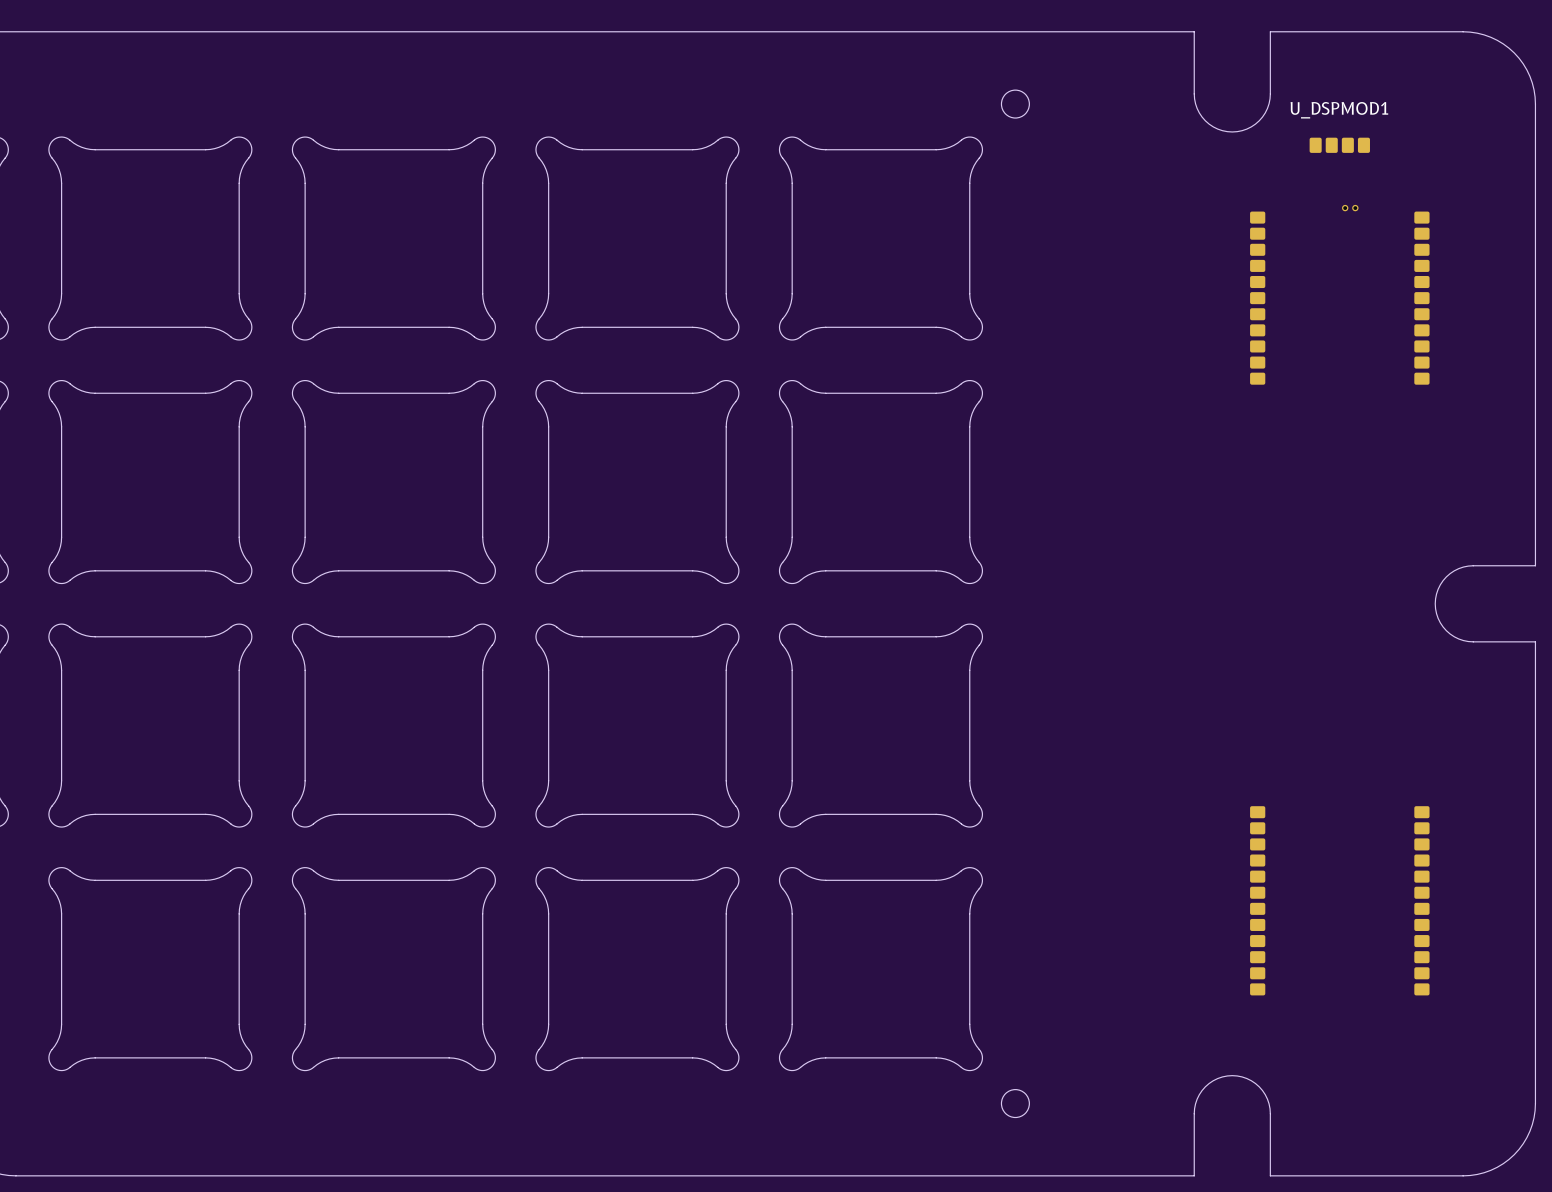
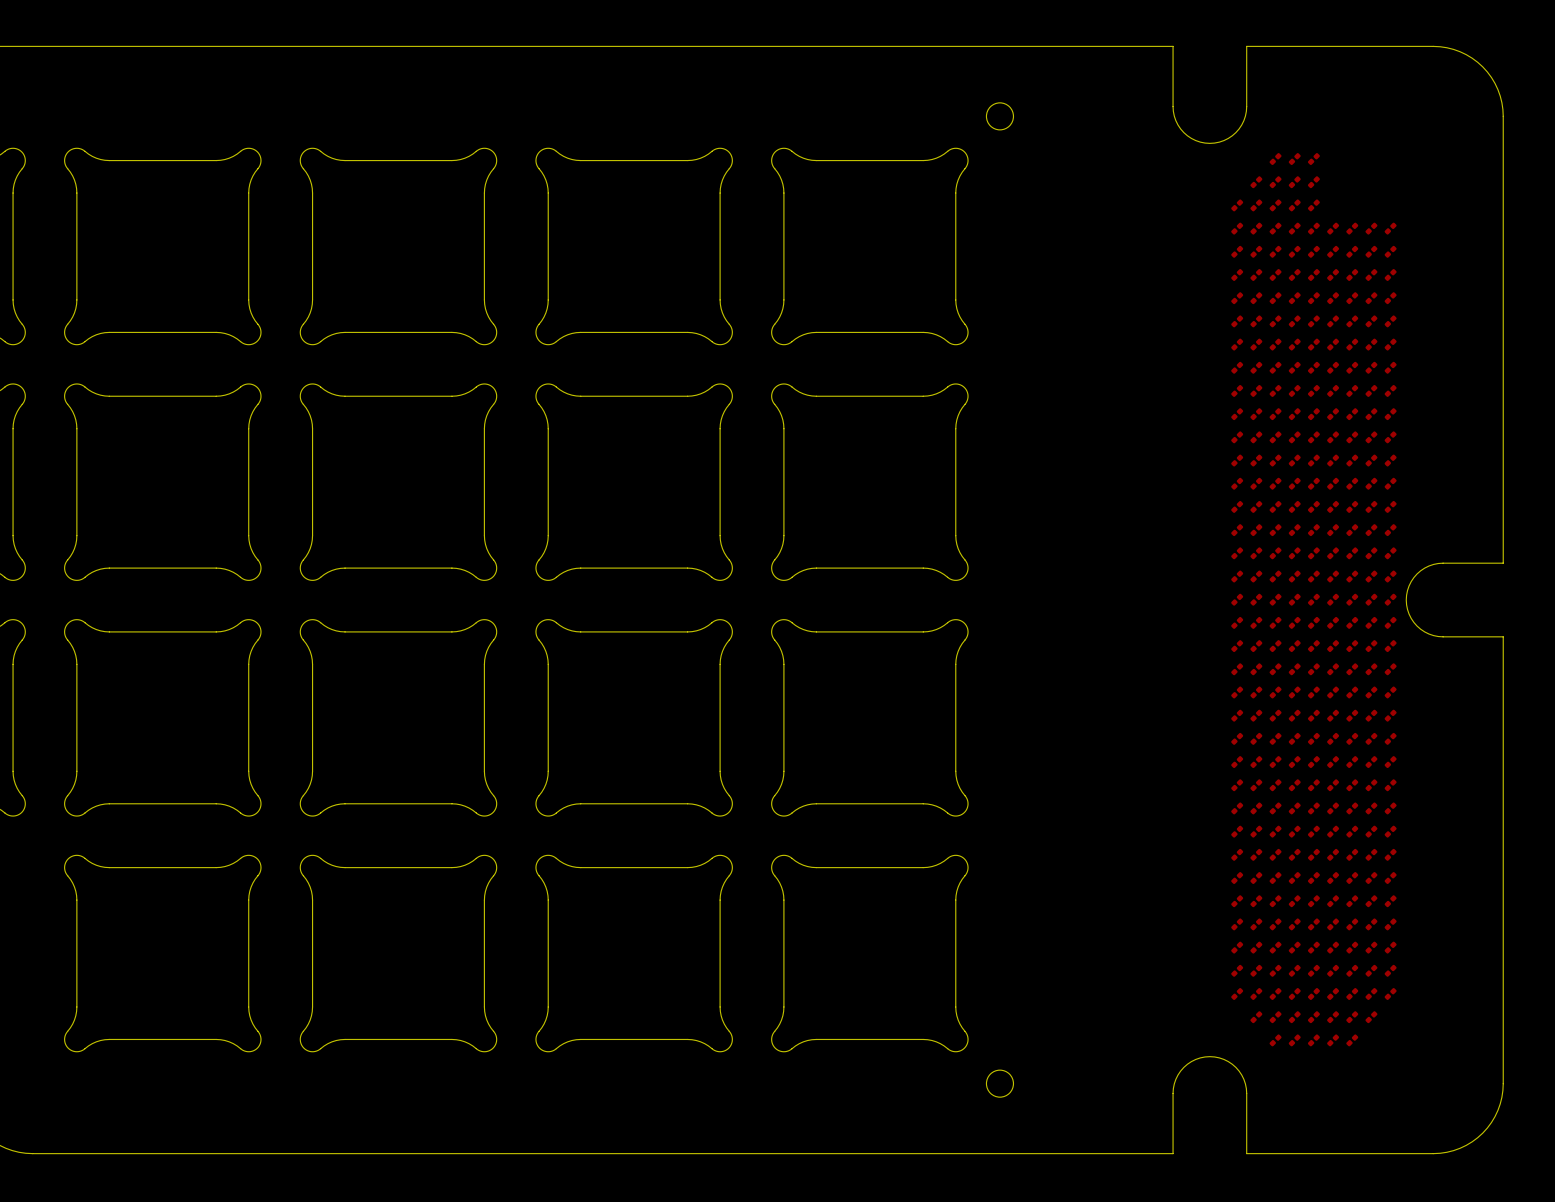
part: none -> (1275, 159)
part: none -> (1294, 159)
part: none -> (1313, 159)
part: none -> (1256, 182)
part: none -> (1275, 182)
part: none -> (1294, 182)
part: none -> (1313, 182)
part: none -> (1237, 205)
part: none -> (1256, 205)
part: none -> (1275, 205)
part: none -> (1294, 205)
part: none -> (1313, 205)
part: (1350, 208) -> none
part: none -> (1237, 228)
part: none -> (1256, 228)
part: none -> (1275, 228)
part: none -> (1294, 228)
part: none -> (1313, 228)
part: none -> (1333, 228)
part: none -> (1352, 228)
part: none -> (1371, 228)
part: none -> (1390, 228)
part: none -> (1237, 251)
part: none -> (1256, 251)
part: none -> (1275, 251)
part: none -> (1294, 251)
part: none -> (1313, 251)
part: none -> (1333, 251)
part: none -> (1352, 251)
part: none -> (1371, 251)
part: none -> (1390, 251)
part: none -> (1237, 274)
part: none -> (1256, 274)
part: none -> (1275, 274)
part: none -> (1294, 274)
part: none -> (1313, 274)
part: none -> (1333, 274)
part: none -> (1352, 274)
part: none -> (1371, 274)
part: none -> (1390, 274)
part: none -> (1237, 298)
part: none -> (1256, 298)
part: none -> (1275, 298)
part: none -> (1294, 298)
part: none -> (1313, 298)
part: none -> (1333, 298)
part: none -> (1352, 298)
part: none -> (1371, 298)
part: none -> (1390, 298)
part: none -> (1237, 321)
part: none -> (1256, 321)
part: none -> (1275, 321)
part: none -> (1294, 321)
part: none -> (1313, 321)
part: none -> (1333, 321)
part: none -> (1352, 321)
part: none -> (1371, 321)
part: none -> (1390, 321)
part: none -> (1237, 344)
part: none -> (1256, 344)
part: none -> (1275, 344)
part: none -> (1294, 344)
part: none -> (1313, 344)
part: none -> (1333, 344)
part: none -> (1352, 344)
part: none -> (1371, 344)
part: none -> (1390, 344)
part: none -> (1237, 367)
part: none -> (1256, 367)
part: none -> (1275, 367)
part: none -> (1294, 367)
part: none -> (1313, 367)
part: none -> (1333, 367)
part: none -> (1352, 367)
part: none -> (1371, 367)
part: none -> (1390, 367)
part: none -> (1237, 390)
part: none -> (1256, 390)
part: none -> (1275, 390)
part: none -> (1294, 390)
part: none -> (1313, 390)
part: none -> (1333, 390)
part: none -> (1352, 390)
part: none -> (1371, 390)
part: none -> (1390, 390)
part: none -> (1237, 414)
part: none -> (1256, 414)
part: none -> (1275, 414)
part: none -> (1294, 414)
part: none -> (1313, 414)
part: none -> (1333, 414)
part: none -> (1352, 414)
part: none -> (1371, 414)
part: none -> (1390, 414)
part: none -> (1237, 437)
part: none -> (1256, 437)
part: none -> (1275, 437)
part: none -> (1294, 437)
part: none -> (1313, 437)
part: none -> (1333, 437)
part: none -> (1352, 437)
part: none -> (1371, 437)
part: none -> (1390, 437)
part: none -> (1237, 460)
part: none -> (1256, 460)
part: none -> (1275, 460)
part: none -> (1294, 460)
part: none -> (1313, 460)
part: none -> (1333, 460)
part: none -> (1352, 460)
part: none -> (1371, 460)
part: none -> (1390, 460)
part: none -> (1237, 483)
part: none -> (1256, 483)
part: none -> (1275, 483)
part: none -> (1294, 483)
part: none -> (1313, 483)
part: none -> (1333, 483)
part: none -> (1352, 483)
part: none -> (1371, 483)
part: none -> (1390, 483)
part: none -> (1237, 506)
part: none -> (1256, 506)
part: none -> (1275, 506)
part: none -> (1294, 506)
part: none -> (1313, 506)
part: none -> (1333, 506)
part: none -> (1352, 506)
part: none -> (1371, 506)
part: none -> (1390, 506)
part: none -> (1237, 530)
part: none -> (1256, 530)
part: none -> (1275, 530)
part: none -> (1294, 530)
part: none -> (1313, 530)
part: none -> (1333, 530)
part: none -> (1352, 530)
part: none -> (1371, 530)
part: none -> (1390, 530)
part: none -> (1237, 553)
part: none -> (1256, 553)
part: none -> (1275, 553)
part: none -> (1294, 553)
part: none -> (1313, 553)
part: none -> (1333, 553)
part: none -> (1352, 553)
part: none -> (1371, 553)
part: none -> (1390, 553)
U_DSPMOD1: (1339, 566) -> none
part: none -> (1237, 576)
part: none -> (1256, 576)
part: none -> (1275, 576)
part: none -> (1294, 576)
part: none -> (1313, 576)
part: none -> (1333, 576)
part: none -> (1352, 576)
part: none -> (1371, 576)
part: none -> (1390, 576)
part: none -> (1237, 599)
part: none -> (1256, 599)
part: none -> (1275, 599)
part: none -> (1294, 599)
part: none -> (1313, 599)
part: none -> (1333, 599)
part: none -> (1352, 599)
part: none -> (1371, 599)
part: none -> (1390, 599)
part: none -> (1237, 622)
part: none -> (1256, 622)
part: none -> (1275, 622)
part: none -> (1294, 622)
part: none -> (1313, 622)
part: none -> (1333, 622)
part: none -> (1352, 622)
part: none -> (1371, 622)
part: none -> (1390, 622)
part: none -> (1237, 646)
part: none -> (1256, 646)
part: none -> (1275, 646)
part: none -> (1294, 646)
part: none -> (1313, 646)
part: none -> (1333, 646)
part: none -> (1352, 646)
part: none -> (1371, 646)
part: none -> (1390, 646)
part: none -> (1237, 669)
part: none -> (1256, 669)
part: none -> (1275, 669)
part: none -> (1294, 669)
part: none -> (1313, 669)
part: none -> (1333, 669)
part: none -> (1352, 669)
part: none -> (1371, 669)
part: none -> (1390, 669)
part: none -> (1237, 692)
part: none -> (1256, 692)
part: none -> (1275, 692)
part: none -> (1294, 692)
part: none -> (1313, 692)
part: none -> (1333, 692)
part: none -> (1352, 692)
part: none -> (1371, 692)
part: none -> (1390, 692)
part: none -> (1237, 715)
part: none -> (1256, 715)
part: none -> (1275, 715)
part: none -> (1294, 715)
part: none -> (1313, 715)
part: none -> (1333, 715)
part: none -> (1352, 715)
part: none -> (1371, 715)
part: none -> (1390, 715)
part: none -> (1237, 738)
part: none -> (1256, 738)
part: none -> (1275, 738)
part: none -> (1294, 738)
part: none -> (1313, 738)
part: none -> (1333, 738)
part: none -> (1352, 738)
part: none -> (1371, 738)
part: none -> (1390, 738)
part: none -> (1237, 762)
part: none -> (1256, 762)
part: none -> (1275, 762)
part: none -> (1294, 762)
part: none -> (1313, 762)
part: none -> (1333, 762)
part: none -> (1352, 762)
part: none -> (1371, 762)
part: none -> (1390, 762)
part: none -> (1237, 785)
part: none -> (1256, 785)
part: none -> (1275, 785)
part: none -> (1294, 785)
part: none -> (1313, 785)
part: none -> (1333, 785)
part: none -> (1352, 785)
part: none -> (1371, 785)
part: none -> (1390, 785)
part: none -> (1237, 808)
part: none -> (1256, 808)
part: none -> (1275, 808)
part: none -> (1294, 808)
part: none -> (1313, 808)
part: none -> (1333, 808)
part: none -> (1352, 808)
part: none -> (1371, 808)
part: none -> (1390, 808)
part: none -> (1237, 831)
part: none -> (1256, 831)
part: none -> (1275, 831)
part: none -> (1294, 831)
part: none -> (1313, 831)
part: none -> (1333, 831)
part: none -> (1352, 831)
part: none -> (1371, 831)
part: none -> (1390, 831)
part: none -> (1237, 854)
part: none -> (1256, 854)
part: none -> (1275, 854)
part: none -> (1294, 854)
part: none -> (1313, 854)
part: none -> (1333, 854)
part: none -> (1352, 854)
part: none -> (1371, 854)
part: none -> (1390, 854)
part: none -> (1237, 878)
part: none -> (1256, 878)
part: none -> (1275, 878)
part: none -> (1294, 878)
part: none -> (1313, 878)
part: none -> (1333, 878)
part: none -> (1352, 878)
part: none -> (1371, 878)
part: none -> (1390, 878)
part: none -> (1237, 901)
part: none -> (1256, 901)
part: none -> (1275, 901)
part: none -> (1294, 901)
part: none -> (1313, 901)
part: none -> (1333, 901)
part: none -> (1352, 901)
part: none -> (1371, 901)
part: none -> (1390, 901)
part: none -> (1237, 924)
part: none -> (1256, 924)
part: none -> (1275, 924)
part: none -> (1294, 924)
part: none -> (1313, 924)
part: none -> (1333, 924)
part: none -> (1352, 924)
part: none -> (1371, 924)
part: none -> (1390, 924)
part: none -> (1237, 947)
part: none -> (1256, 947)
part: none -> (1275, 947)
part: none -> (1294, 947)
part: none -> (1313, 947)
part: none -> (1333, 947)
part: none -> (1352, 947)
part: none -> (1371, 947)
part: none -> (1390, 947)
part: none -> (1237, 970)
part: none -> (1256, 970)
part: none -> (1275, 970)
part: none -> (1294, 970)
part: none -> (1313, 970)
part: none -> (1333, 970)
part: none -> (1352, 970)
part: none -> (1371, 970)
part: none -> (1390, 970)
part: none -> (1237, 994)
part: none -> (1256, 994)
part: none -> (1275, 994)
part: none -> (1294, 994)
part: none -> (1313, 994)
part: none -> (1333, 994)
part: none -> (1352, 994)
part: none -> (1371, 994)
part: none -> (1390, 994)
part: none -> (1256, 1017)
part: none -> (1275, 1017)
part: none -> (1294, 1017)
part: none -> (1313, 1017)
part: none -> (1333, 1017)
part: none -> (1352, 1017)
part: none -> (1371, 1017)
part: none -> (1275, 1040)
part: none -> (1294, 1040)
part: none -> (1313, 1040)
part: none -> (1333, 1040)
part: none -> (1352, 1040)

